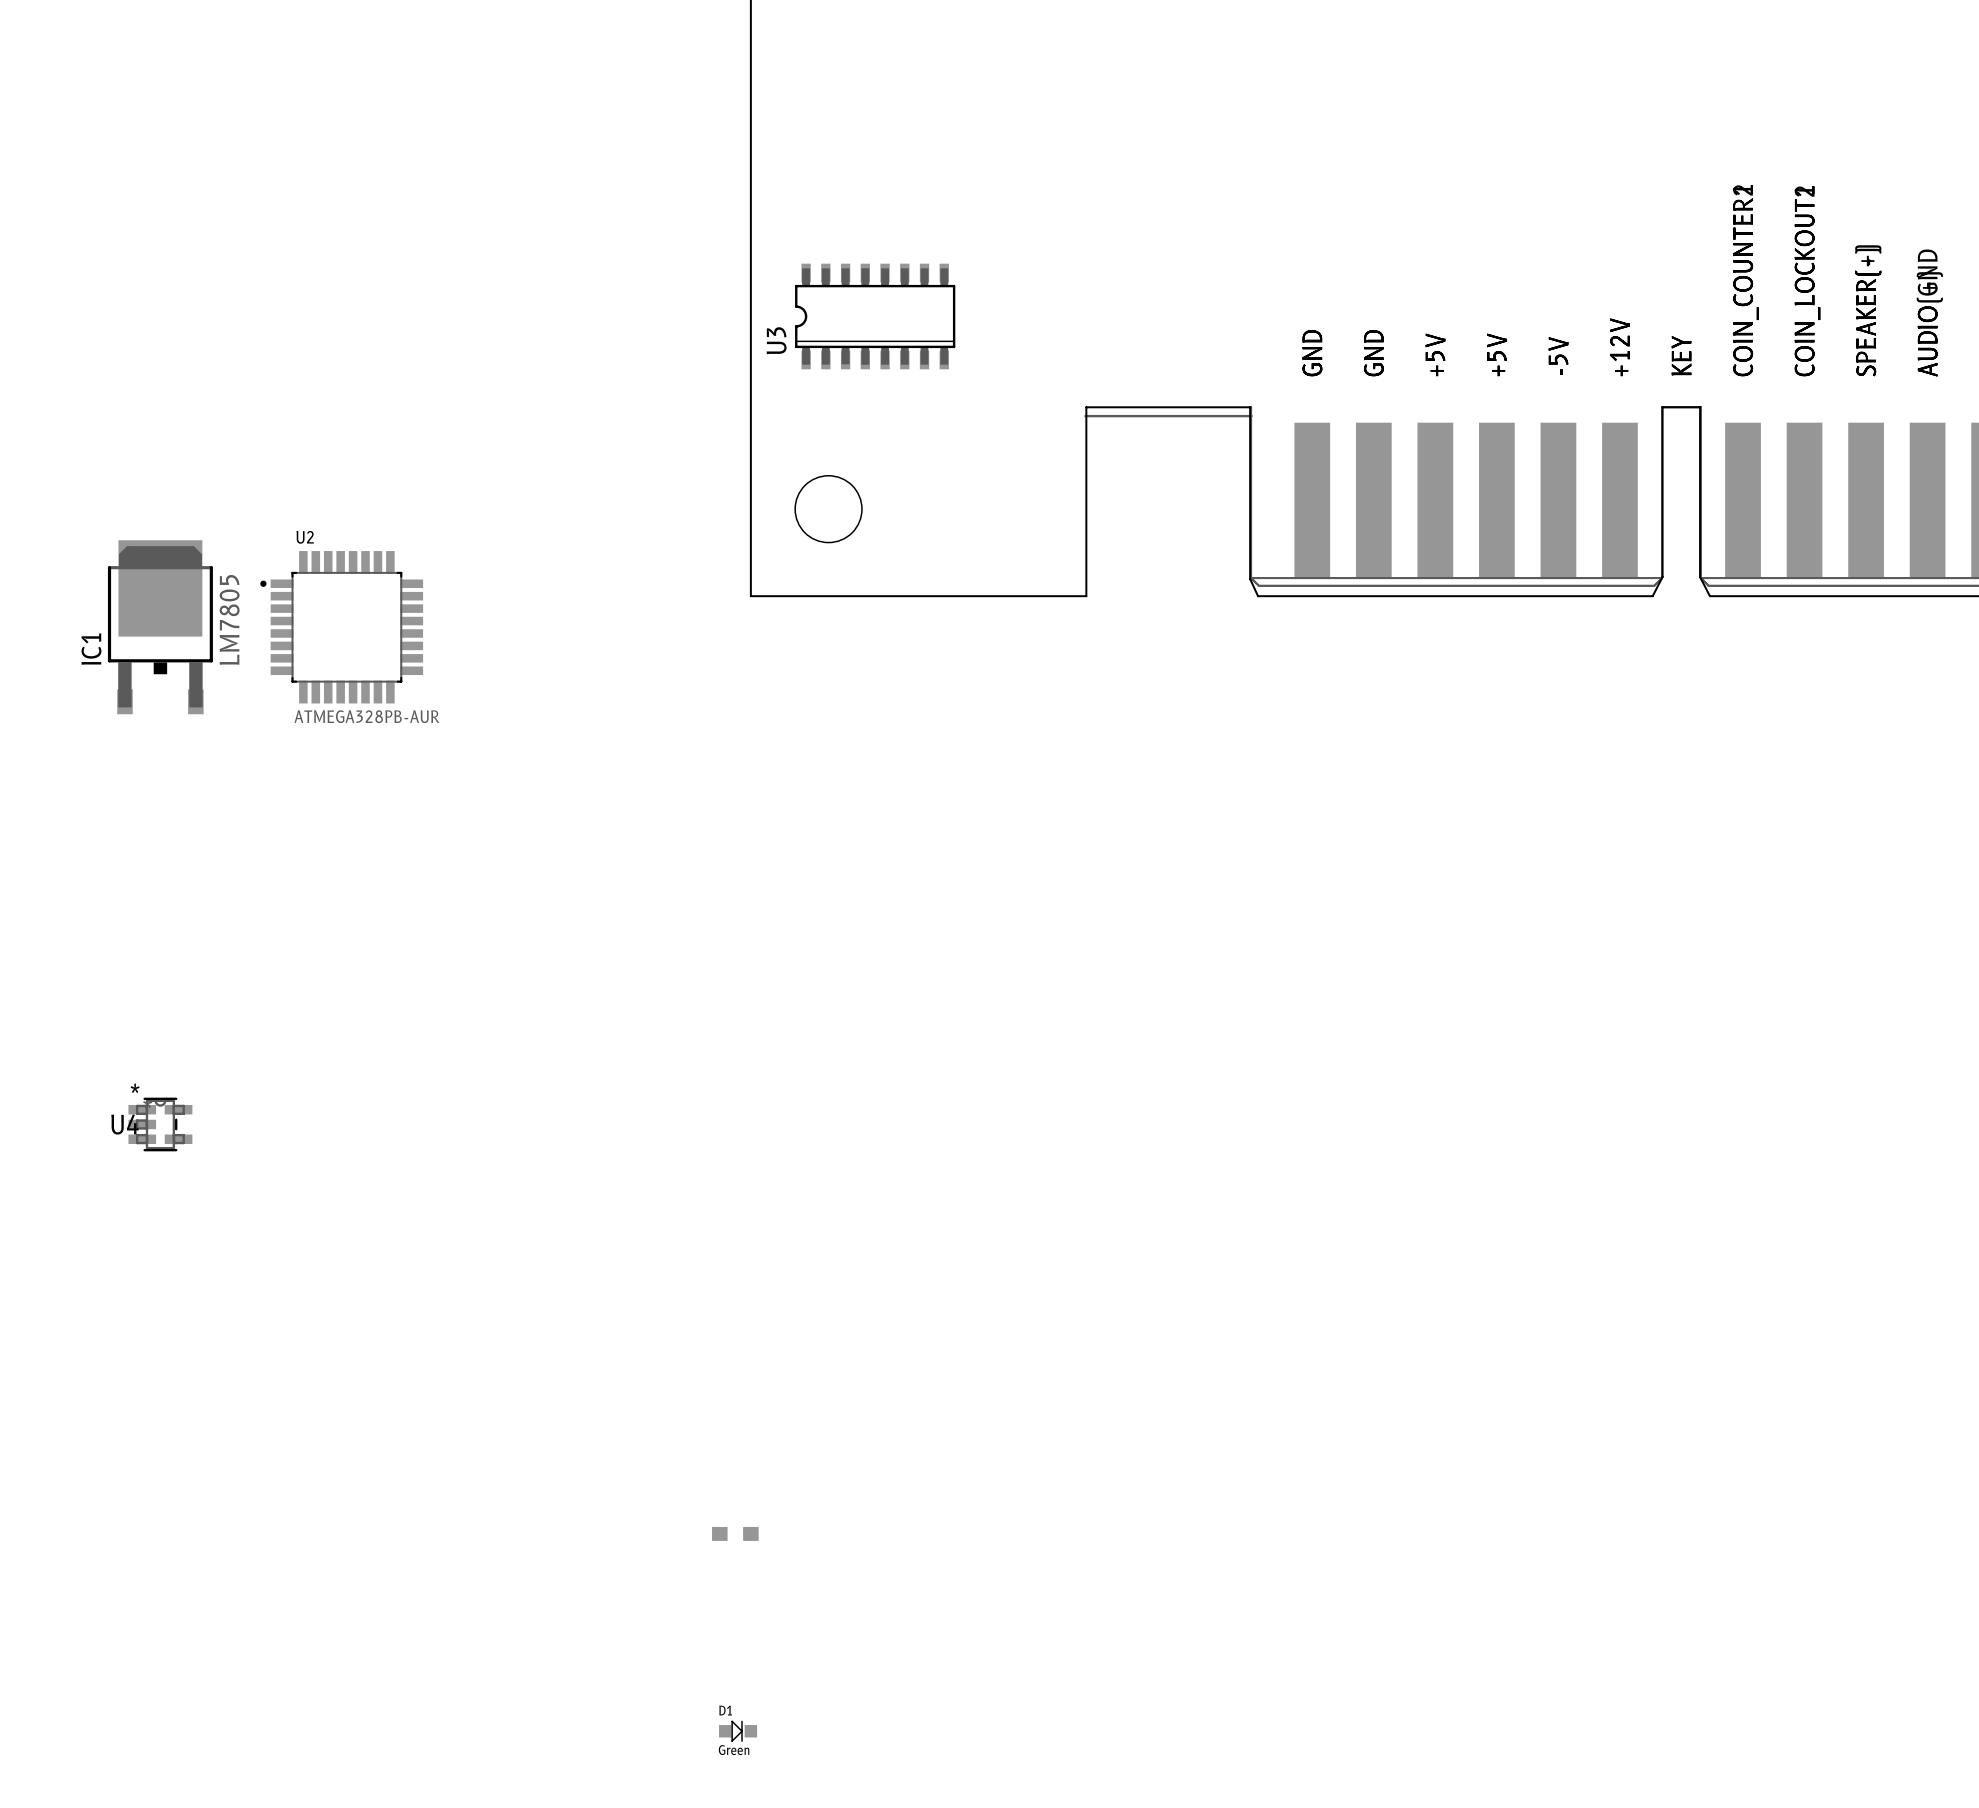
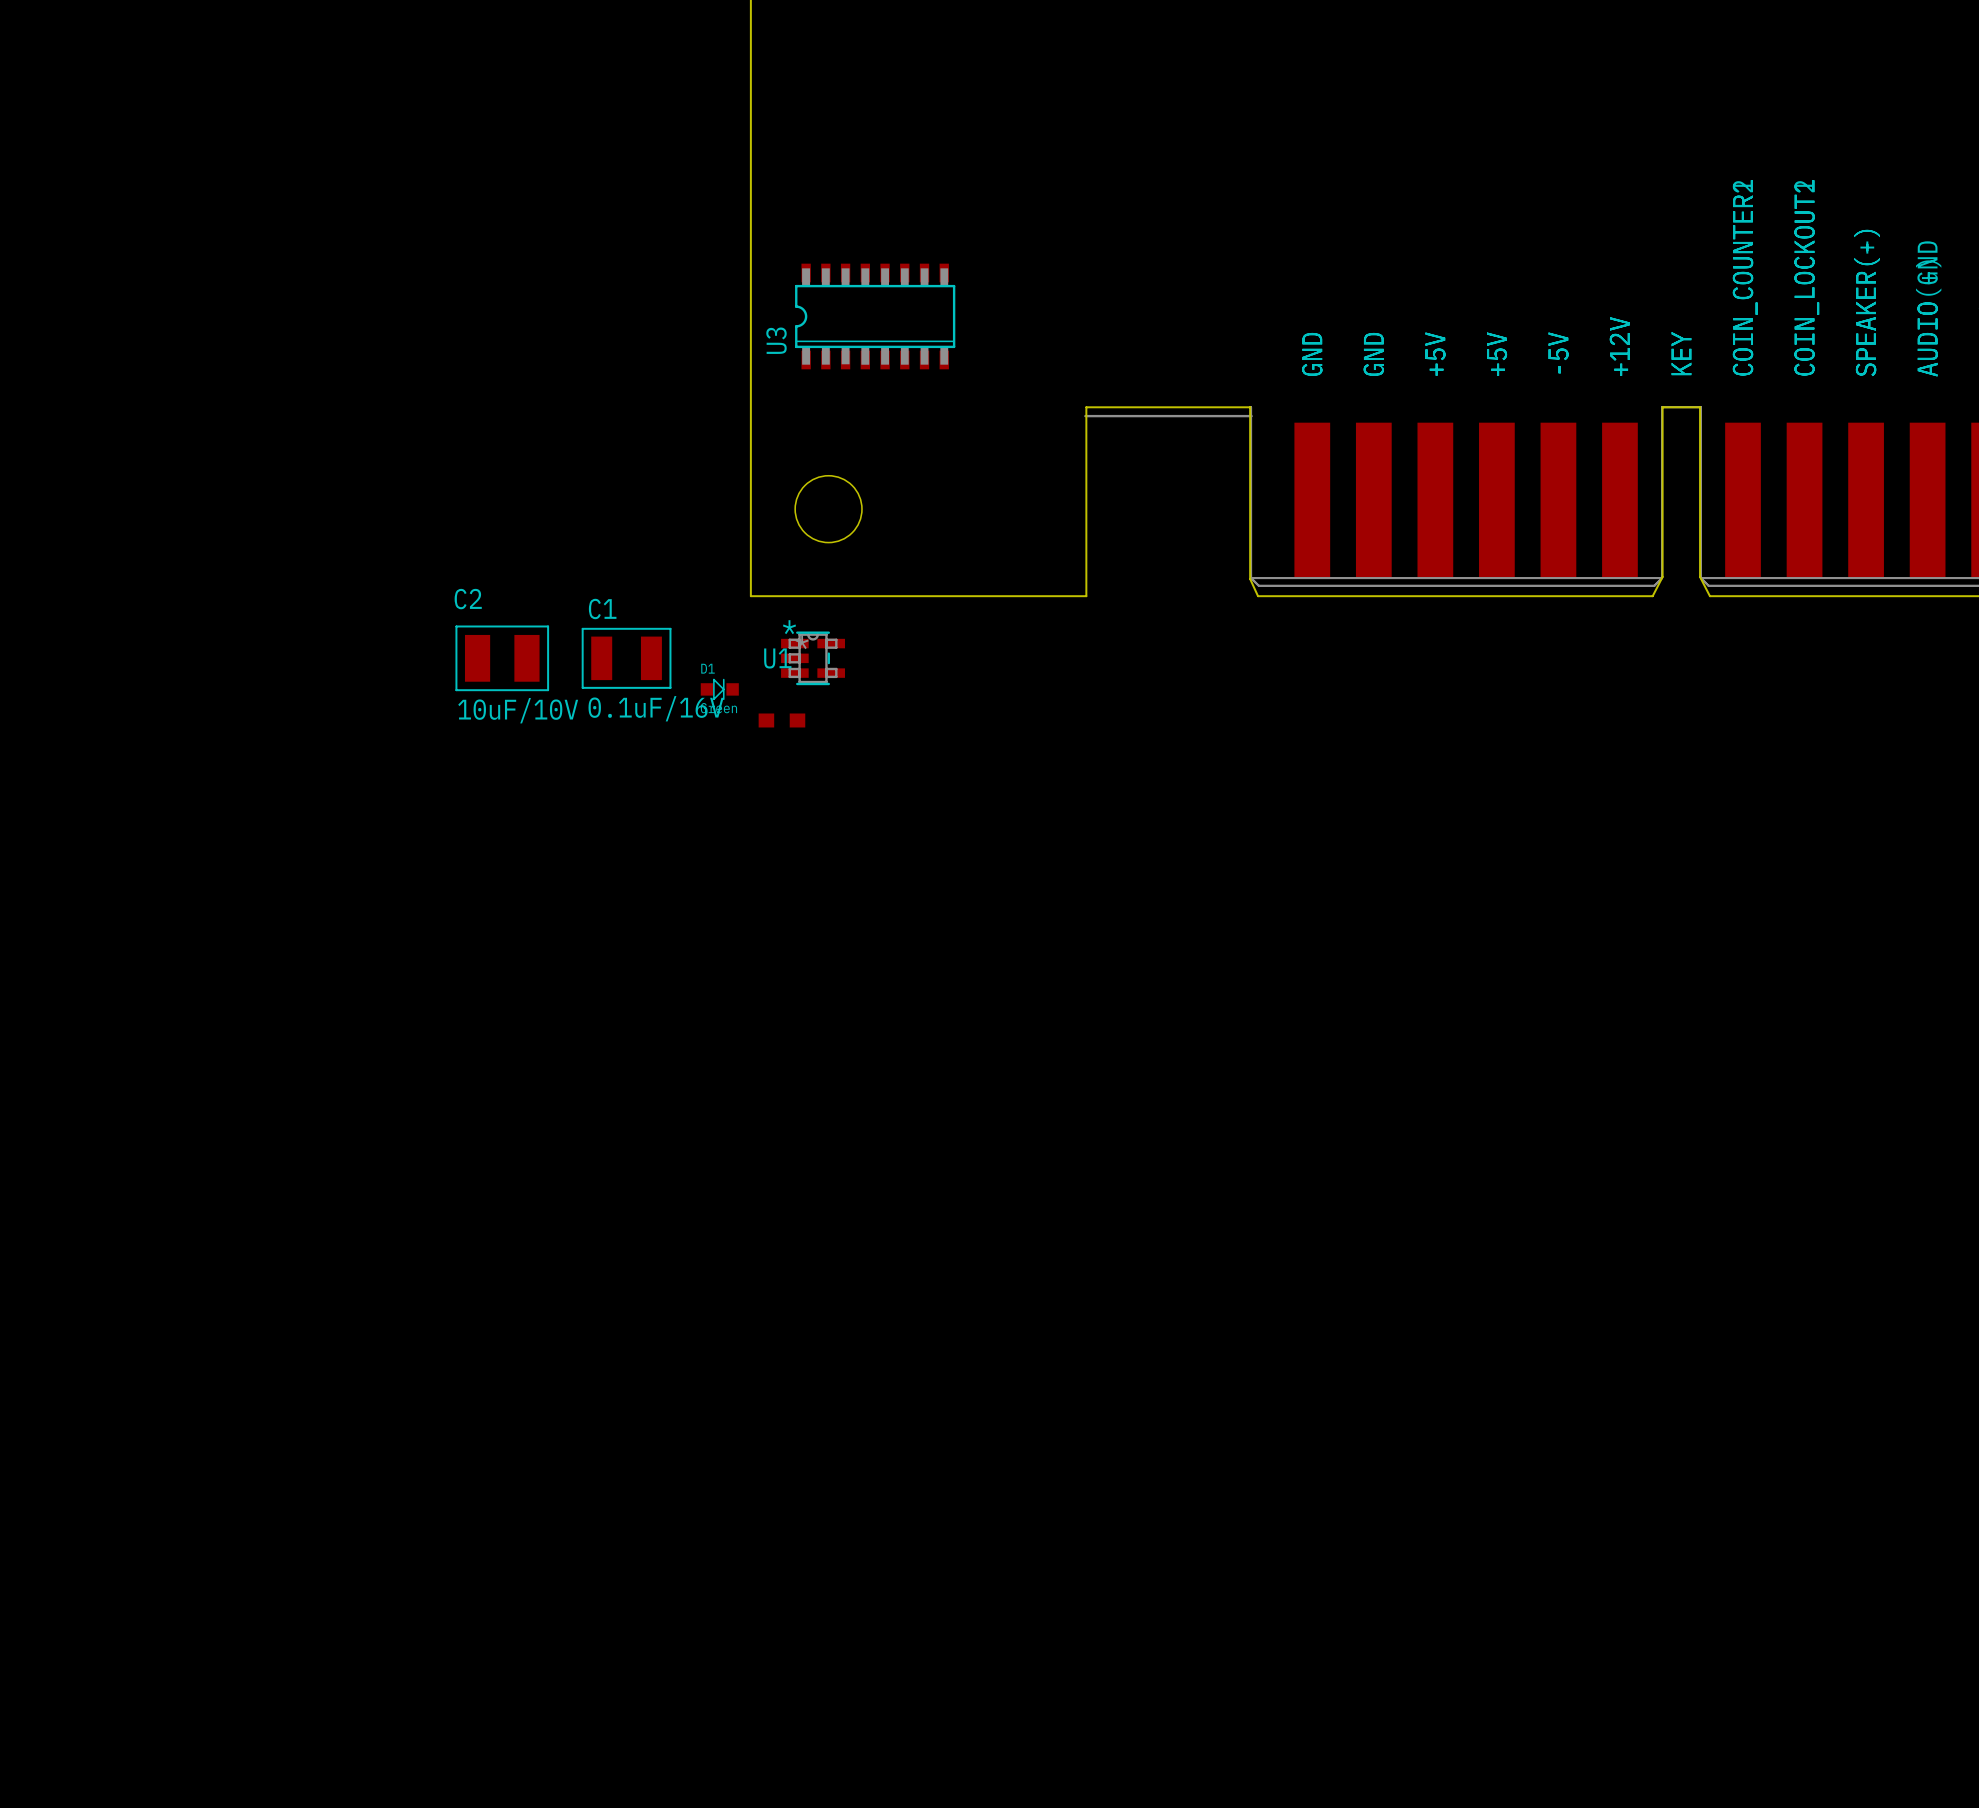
IC1: LM7805 (160, 627) -> none
U2: ATMEGA328PB-AUR (341, 627) -> none
C2: none -> 10uF/10V (502, 658)
C1: none -> 0.1uF/16V (626, 658)
U1: none -> (813, 658)
part: none -> (781, 720)
U4: (160, 1124) -> none
part: (735, 1533) -> none
D1 position: (738, 1731) -> (719, 689)

